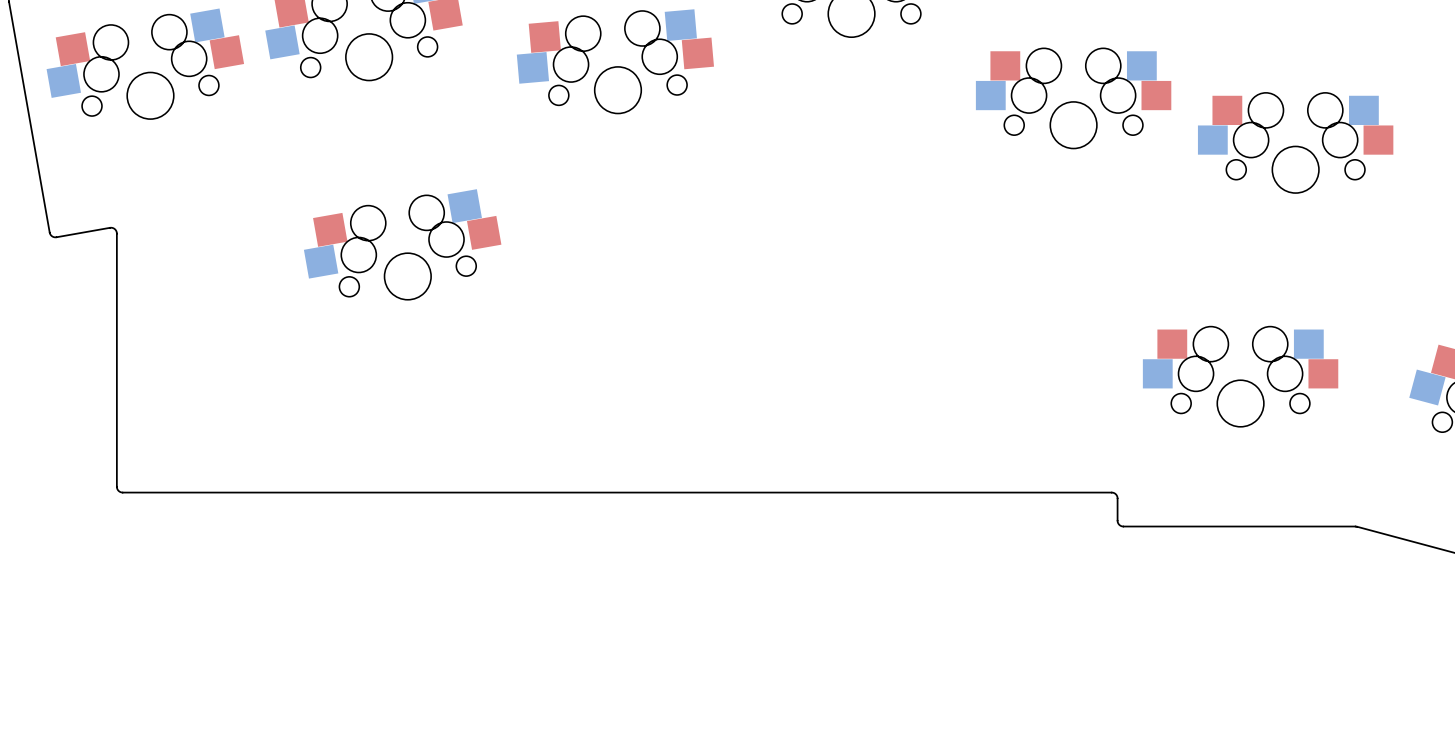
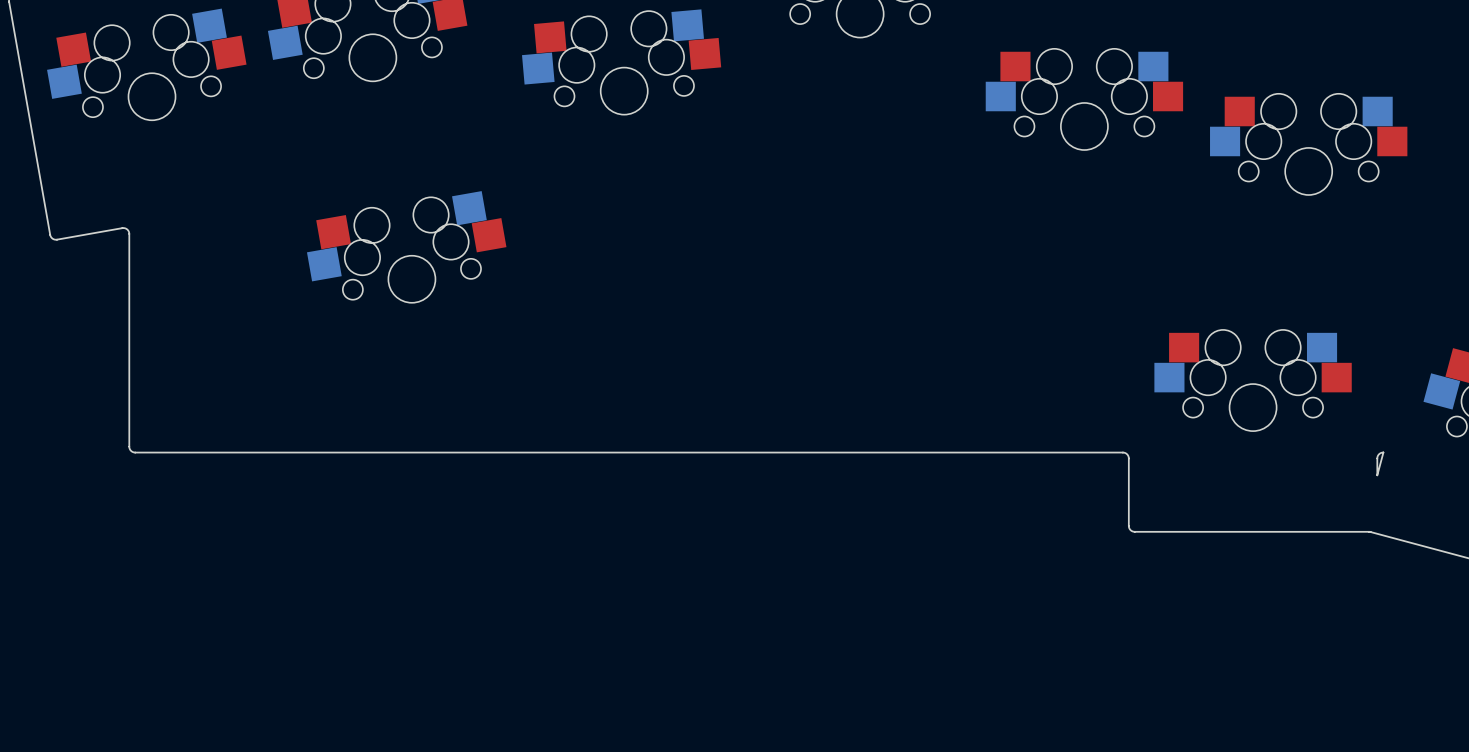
board edge: (110, 227) (114, 229) (116, 233) (116, 486) (121, 492) (1111, 492) (1115, 494) (1117, 498) -> (111, 230) (124, 228) (129, 233) (129, 446) (133, 452) (1122, 452) (1128, 457) (1128, 503)
board edge: none -> (1383, 452) (1377, 457) (1377, 475) (1383, 452)

